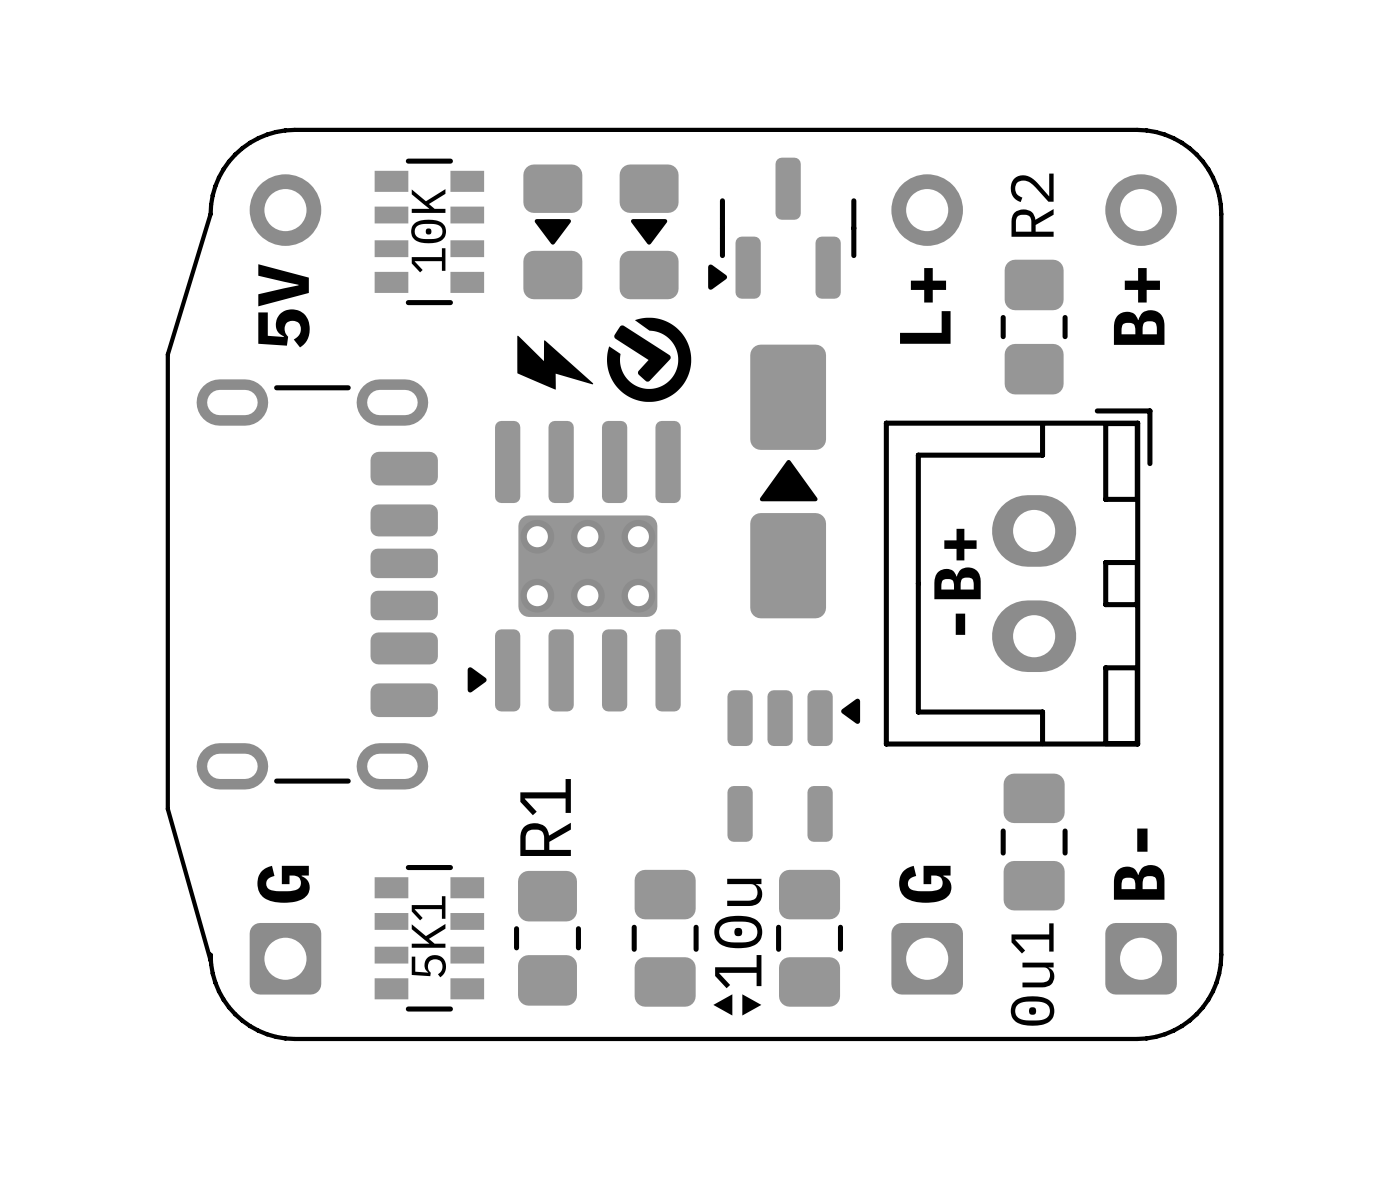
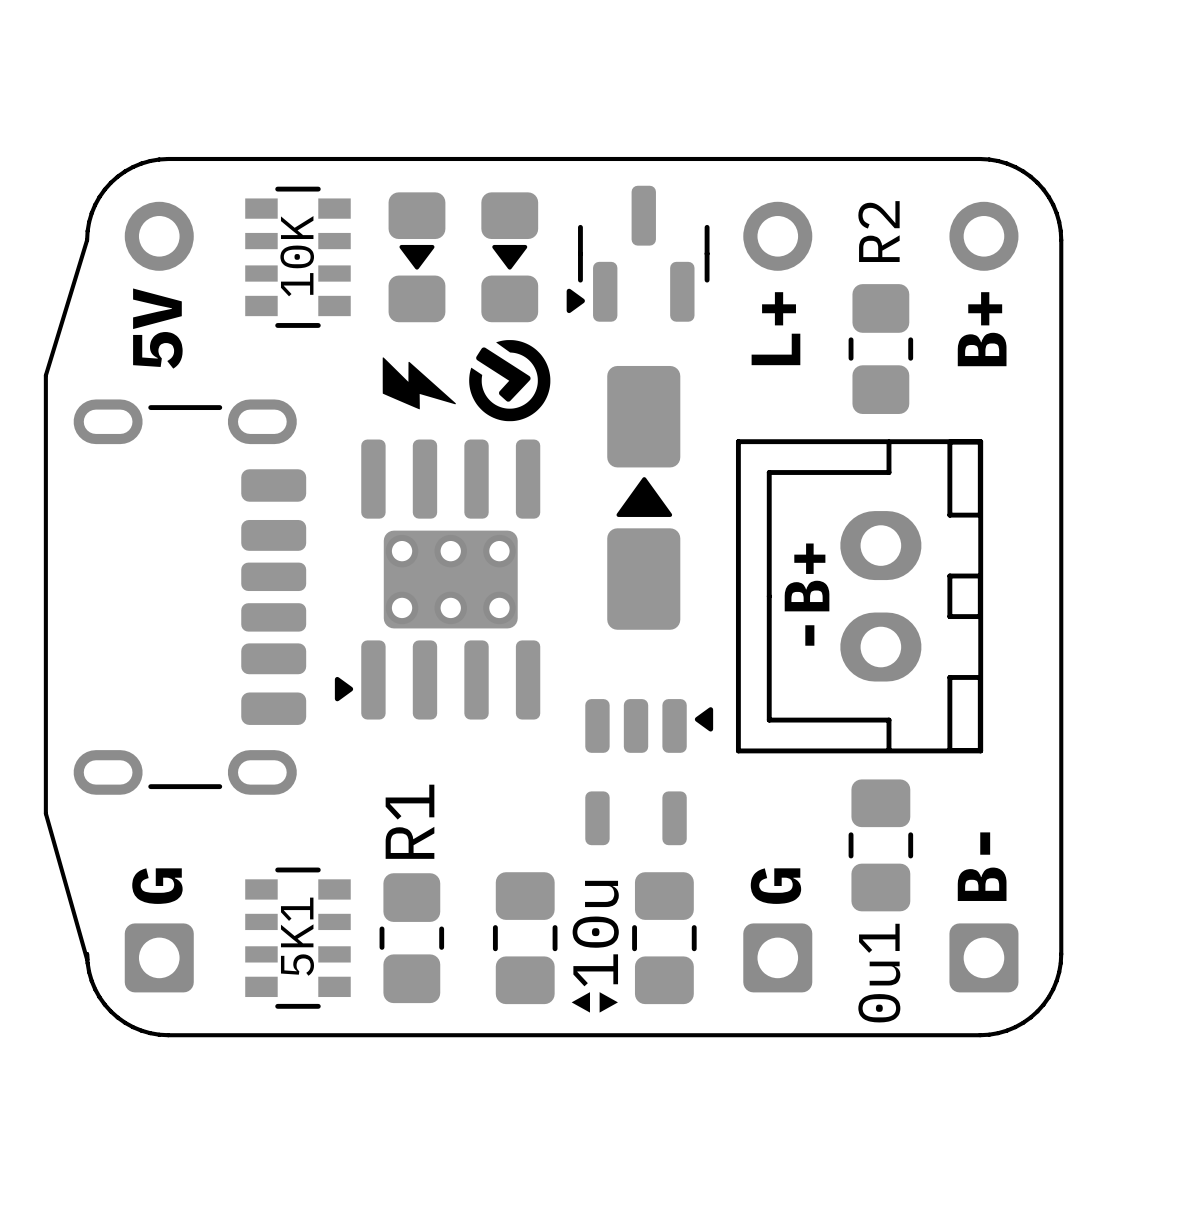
part footprint: [883, 408, 1153, 747] -> [735, 439, 984, 754]

